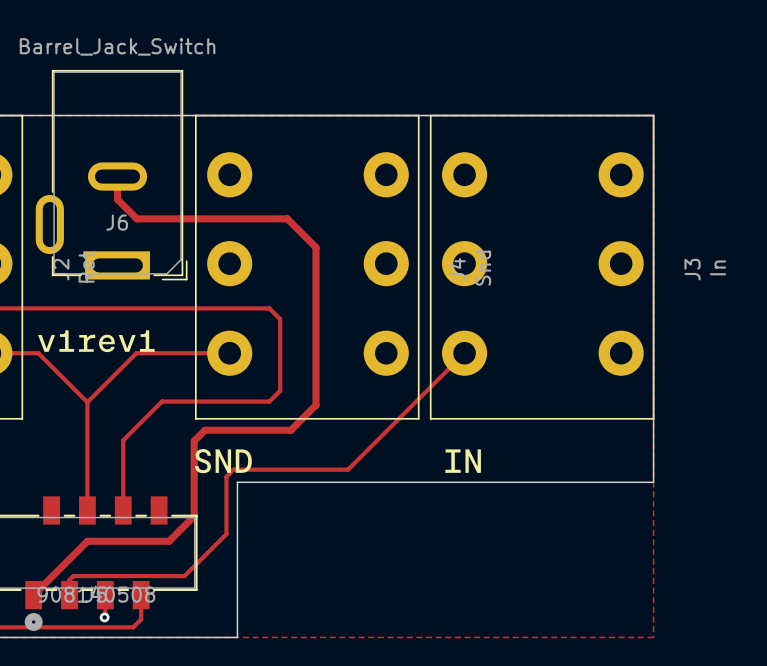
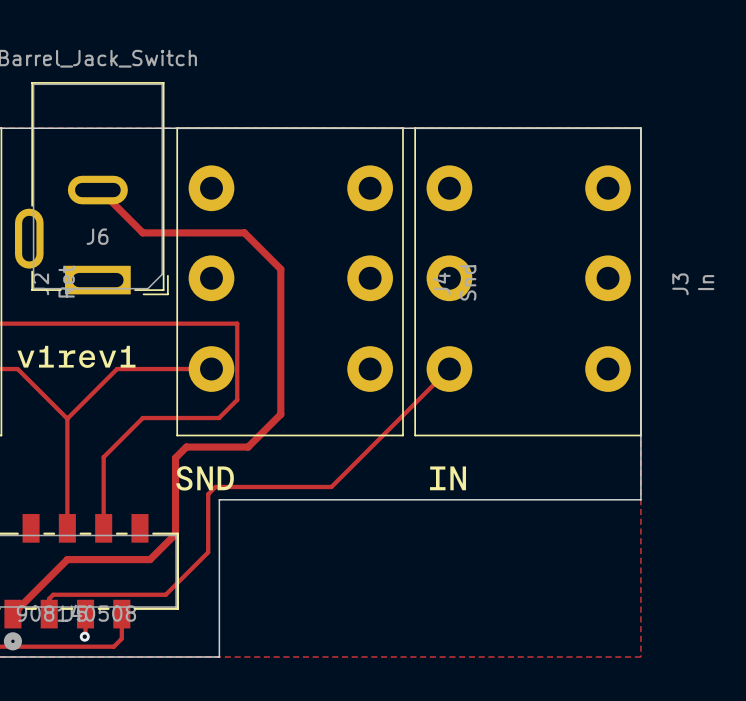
track: (117, 176) (117, 199) (136, 218) (161, 218) -> (76, 190) (100, 190) (142, 232)
track: (262, 218) (287, 218) (316, 247) (316, 405) (290, 430) (265, 430) -> (244, 232) (280, 269) (280, 414) (248, 447)
track: (255, 308) (269, 308) (280, 319) (280, 390) (269, 401) (237, 401) -> (237, 323) (237, 399) (219, 418)

